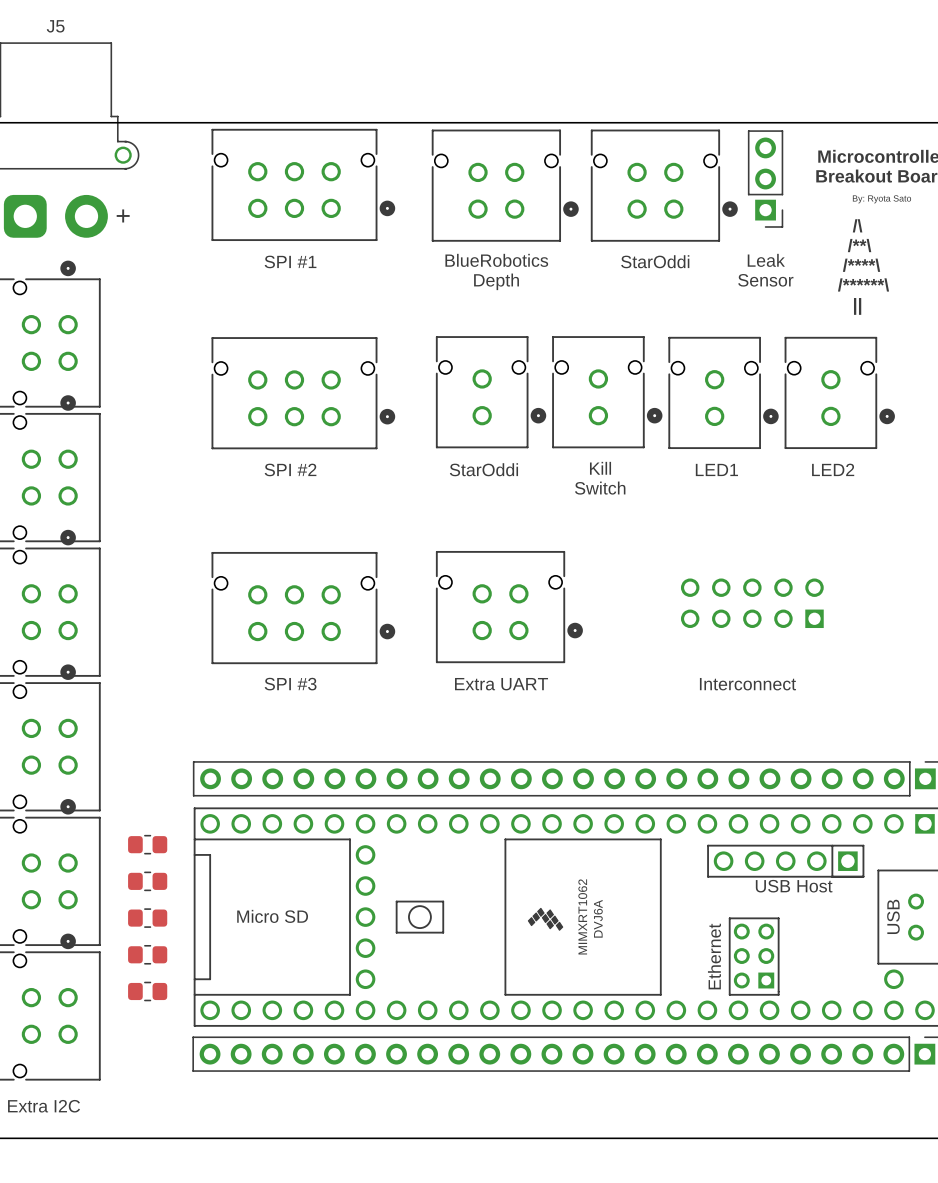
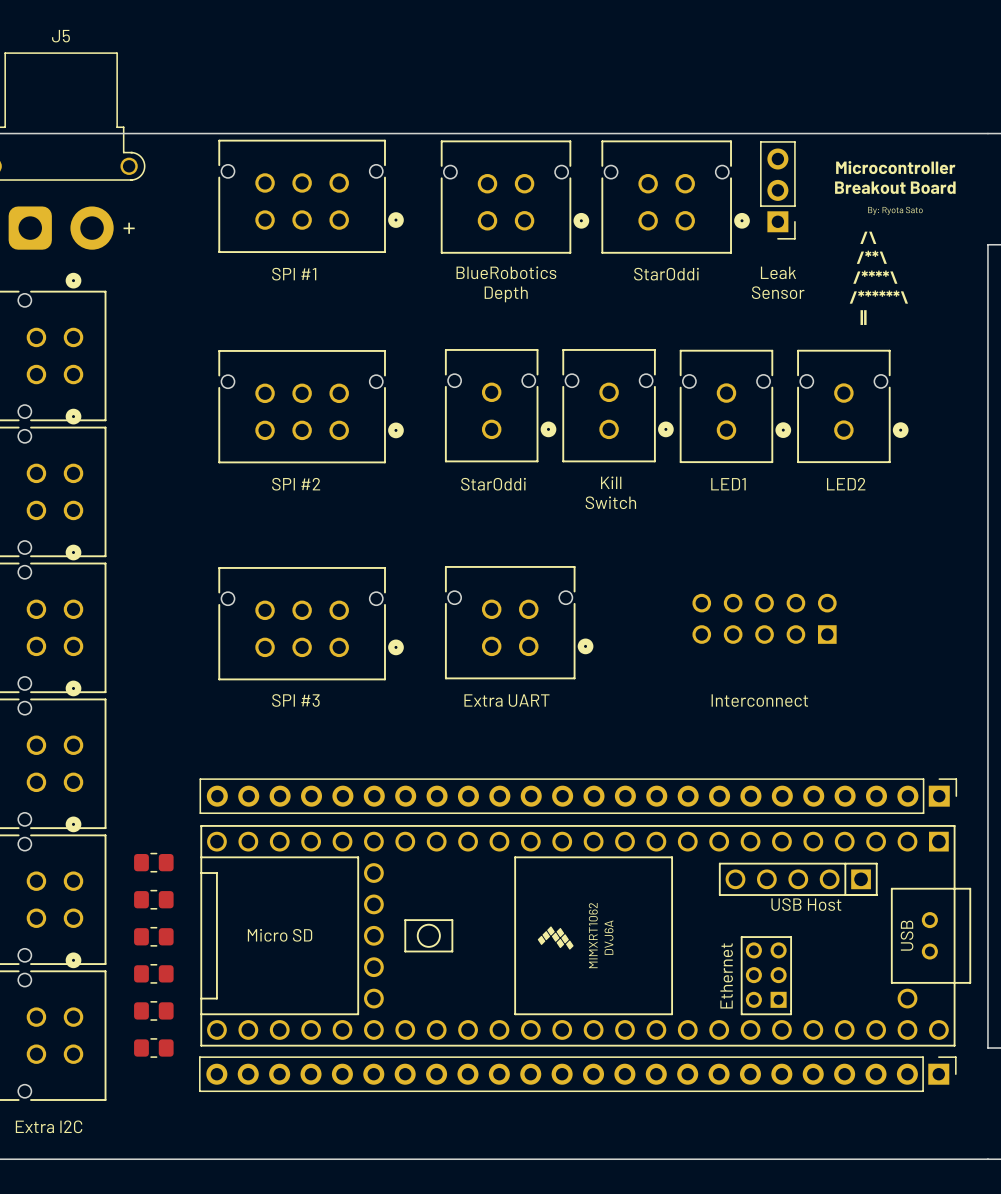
part: none -> (153, 1048)

